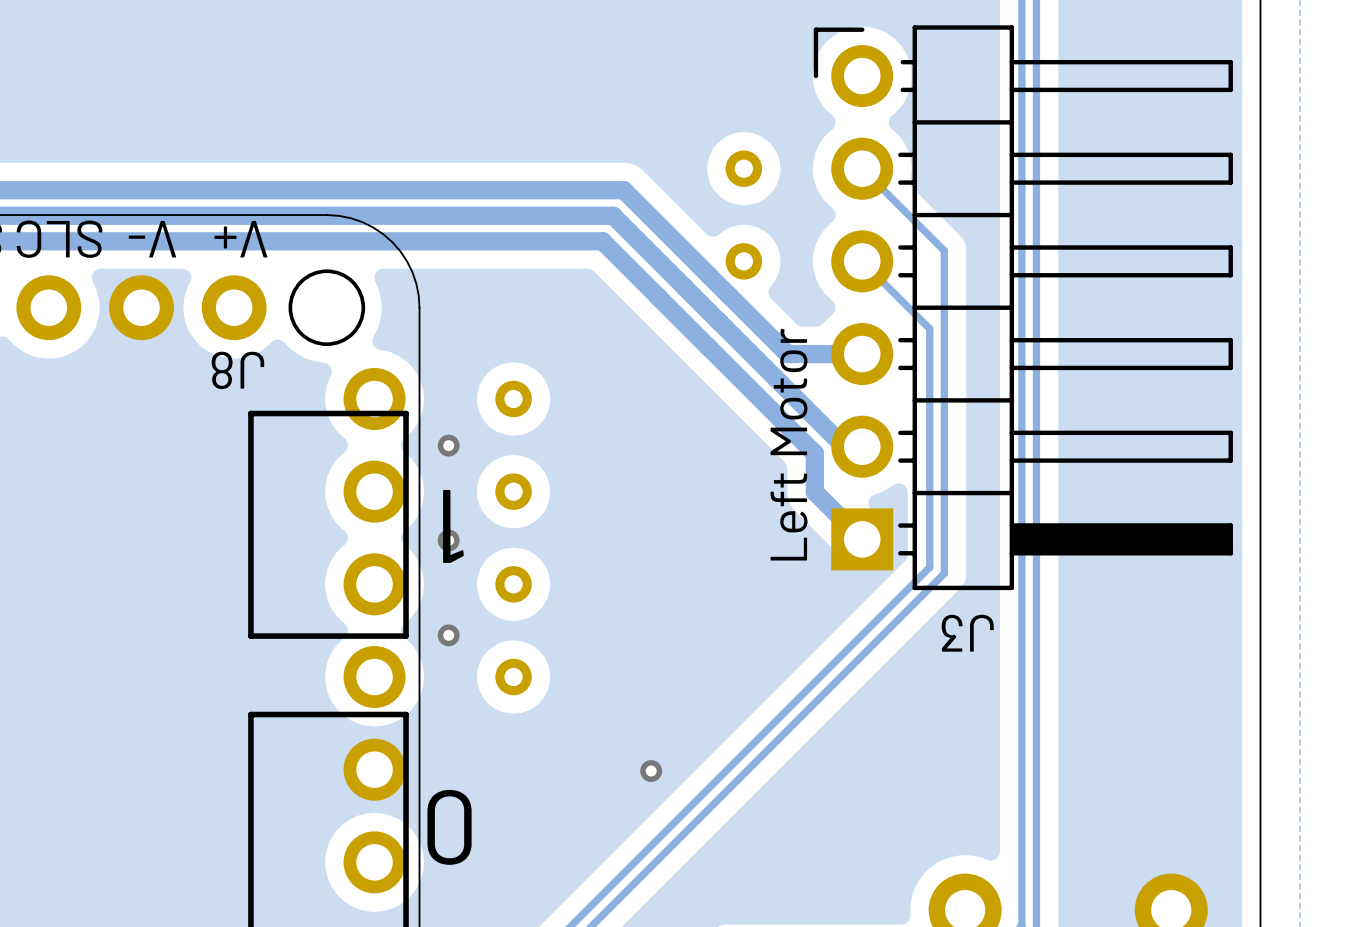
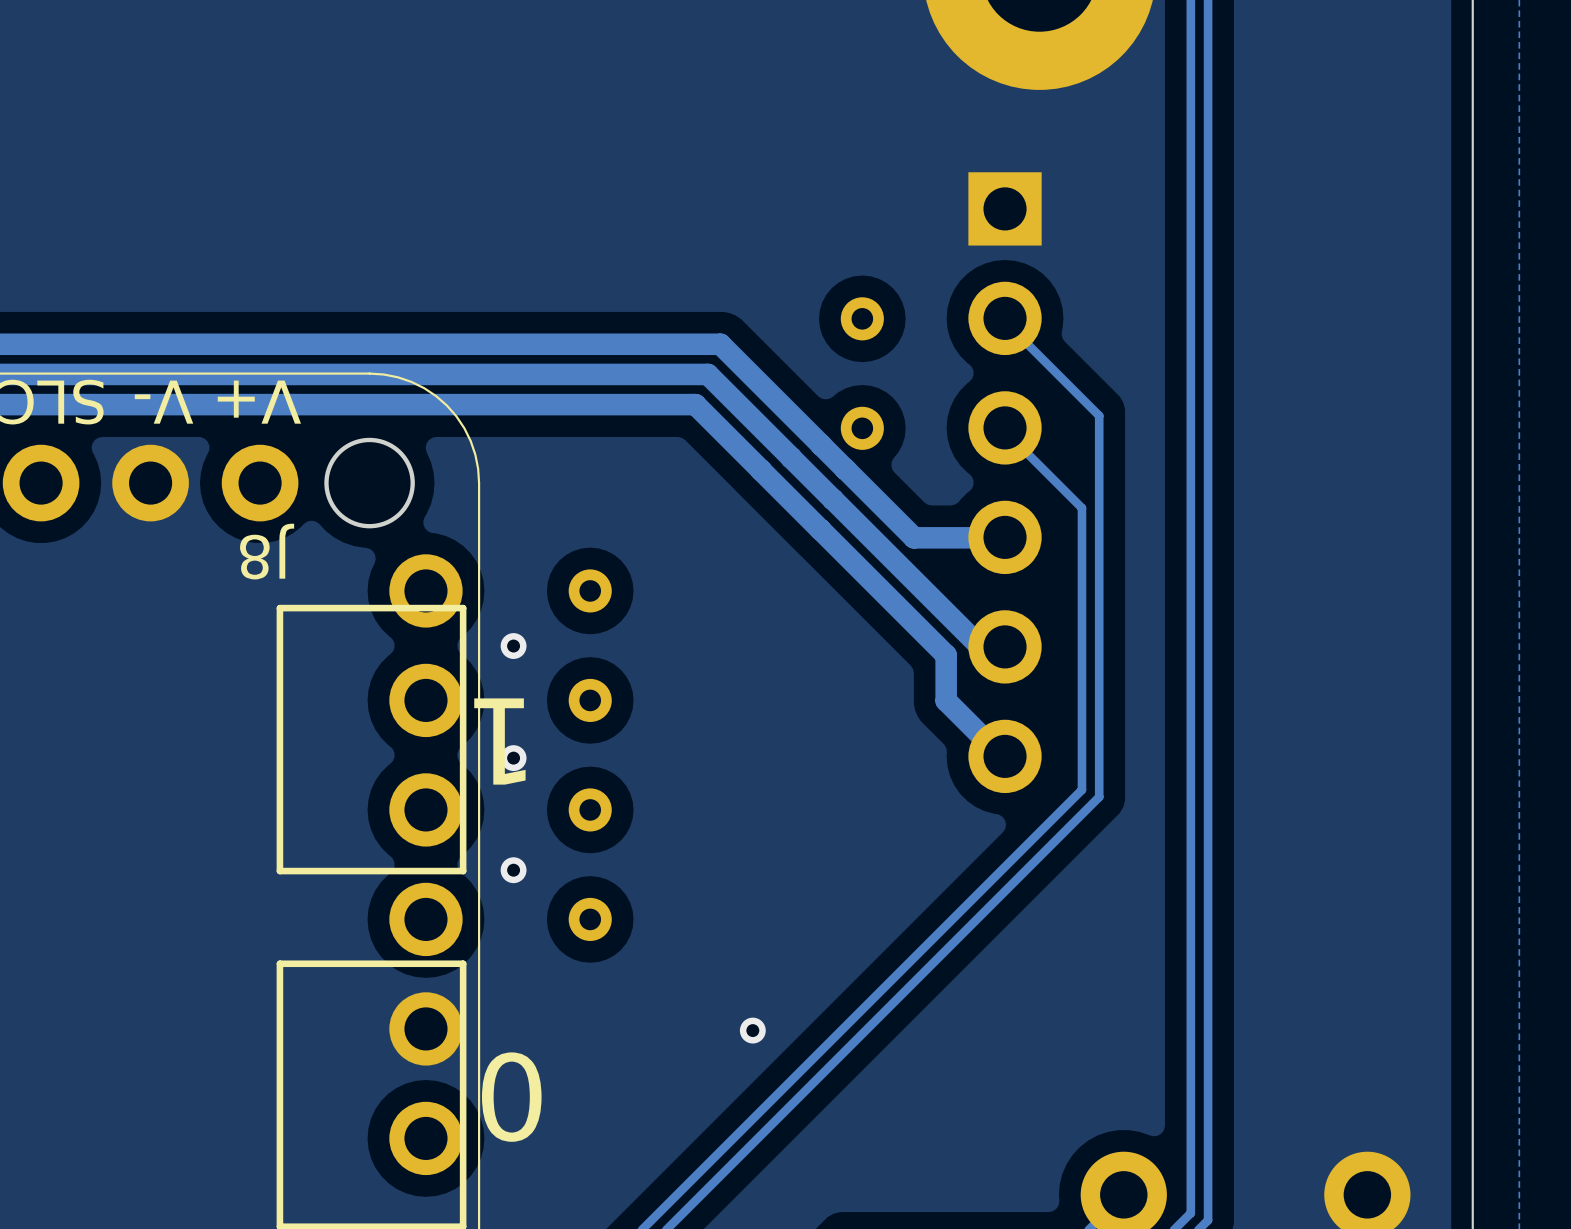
J3 side: bottom (1023, 307) -> top (1005, 482)

